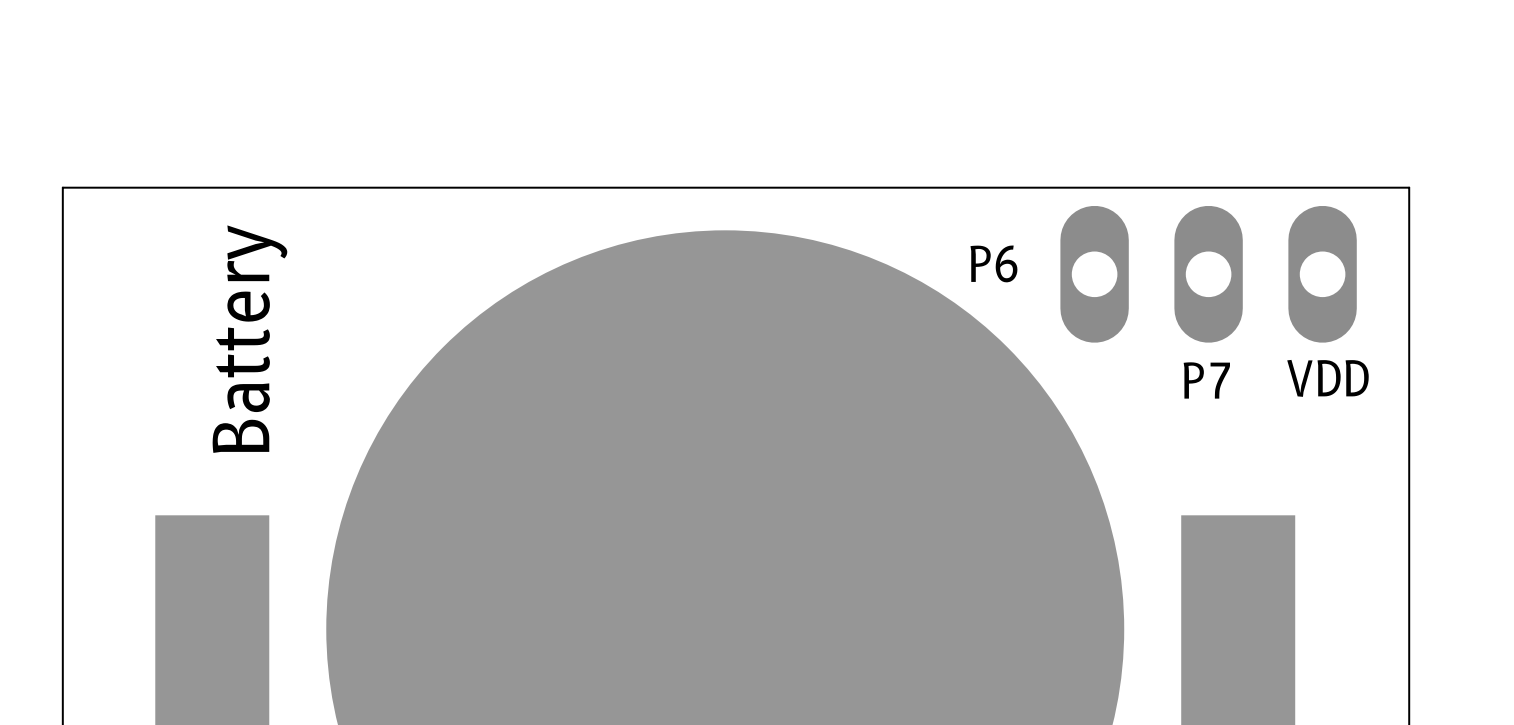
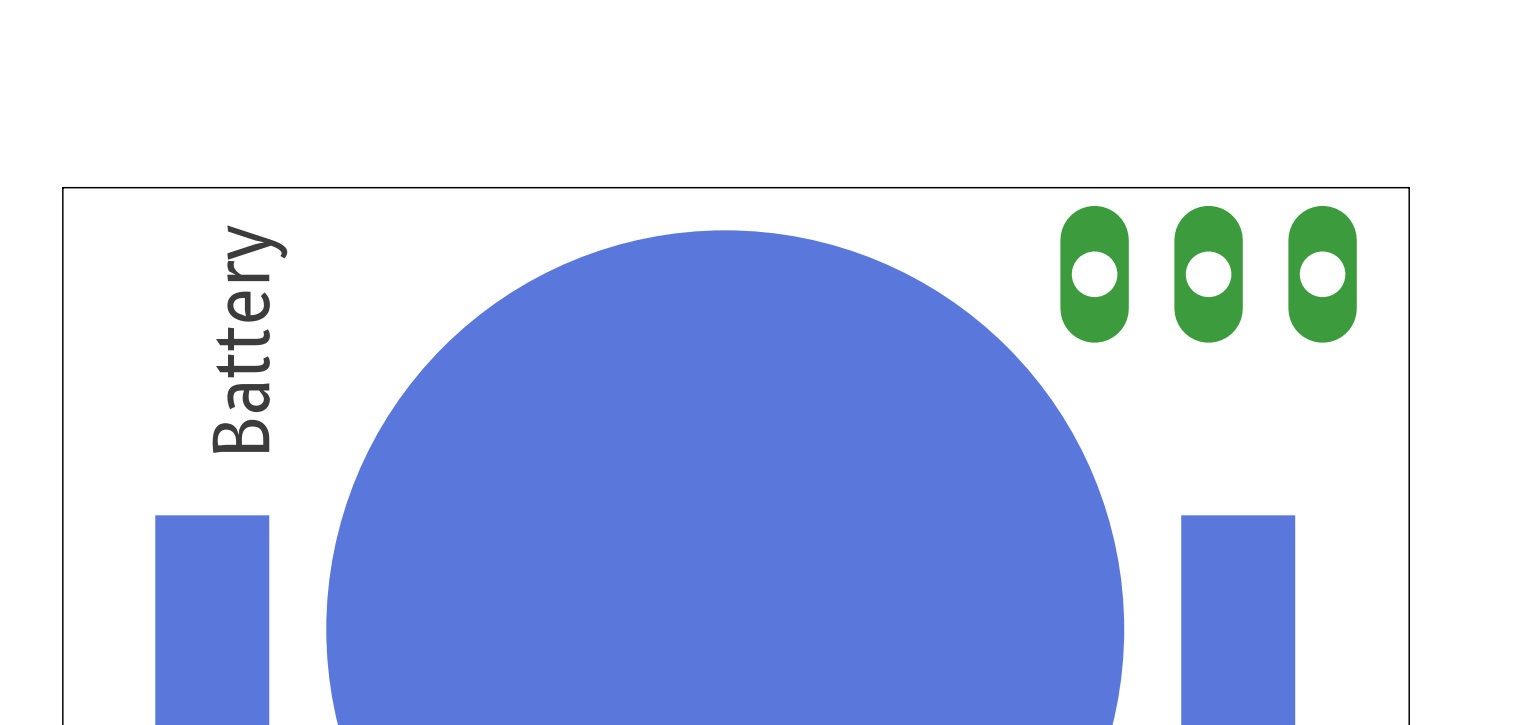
text: P6 (993, 263) -> none
text: VDD (1327, 378) -> none
text: P7 (1206, 380) -> none

